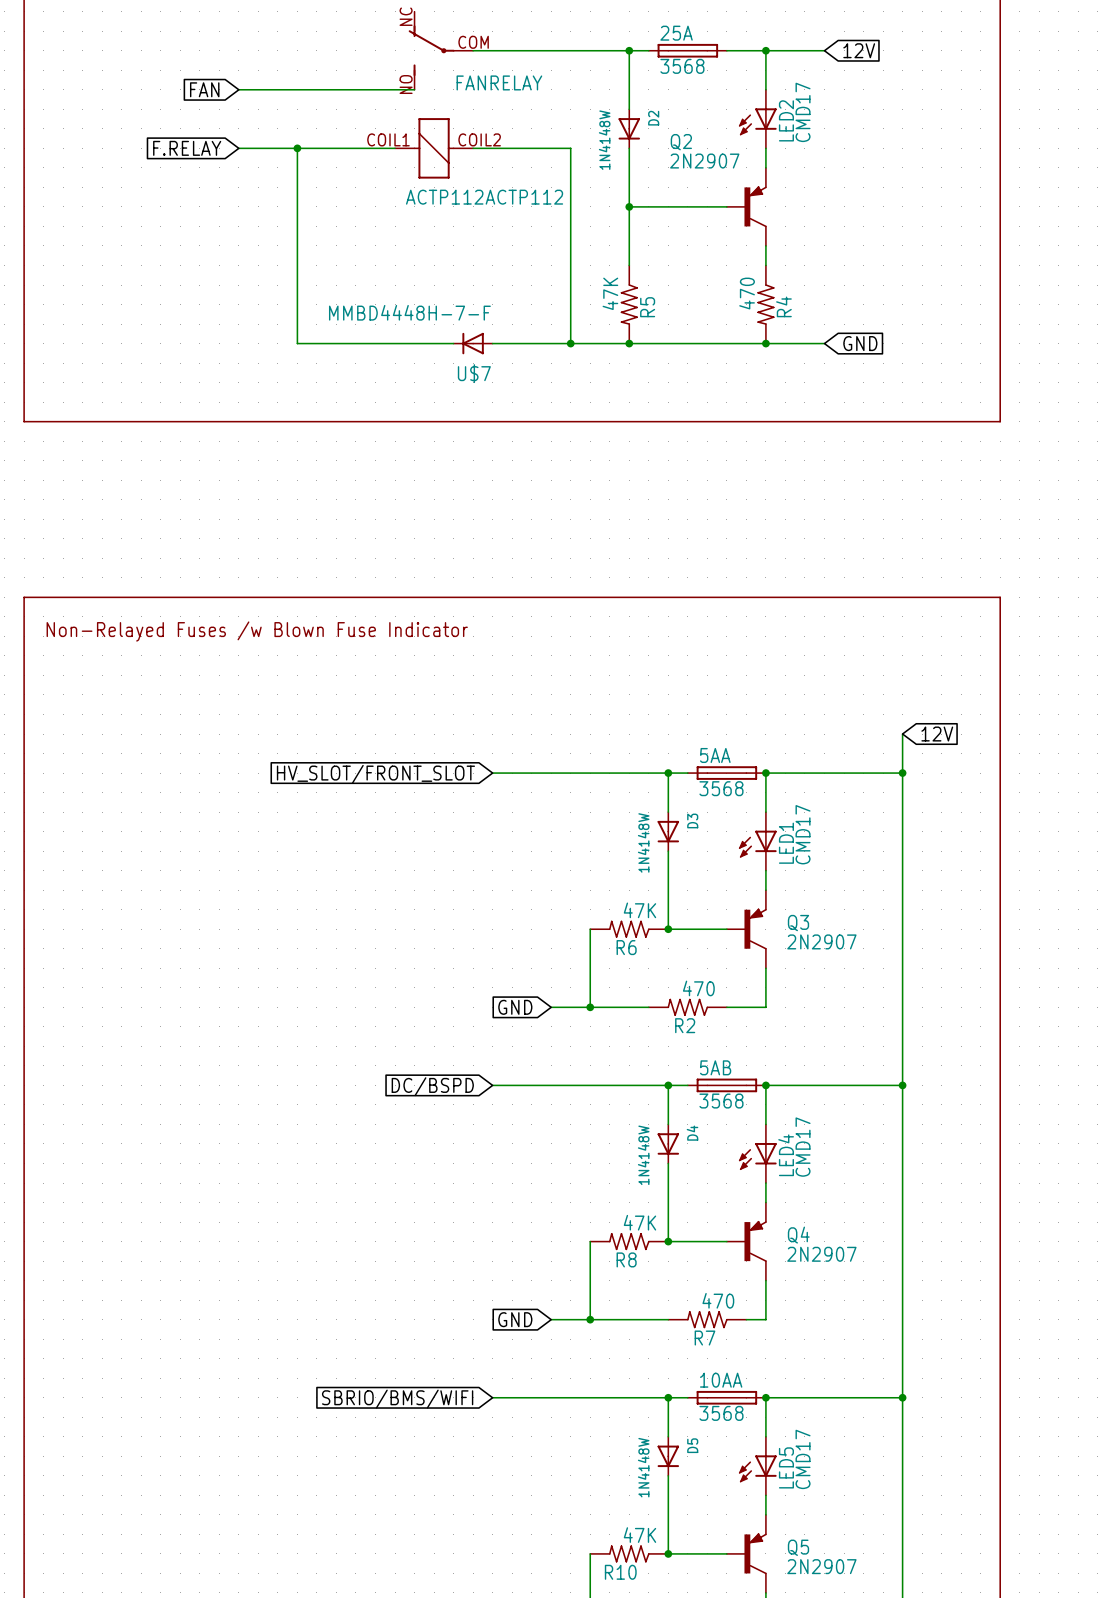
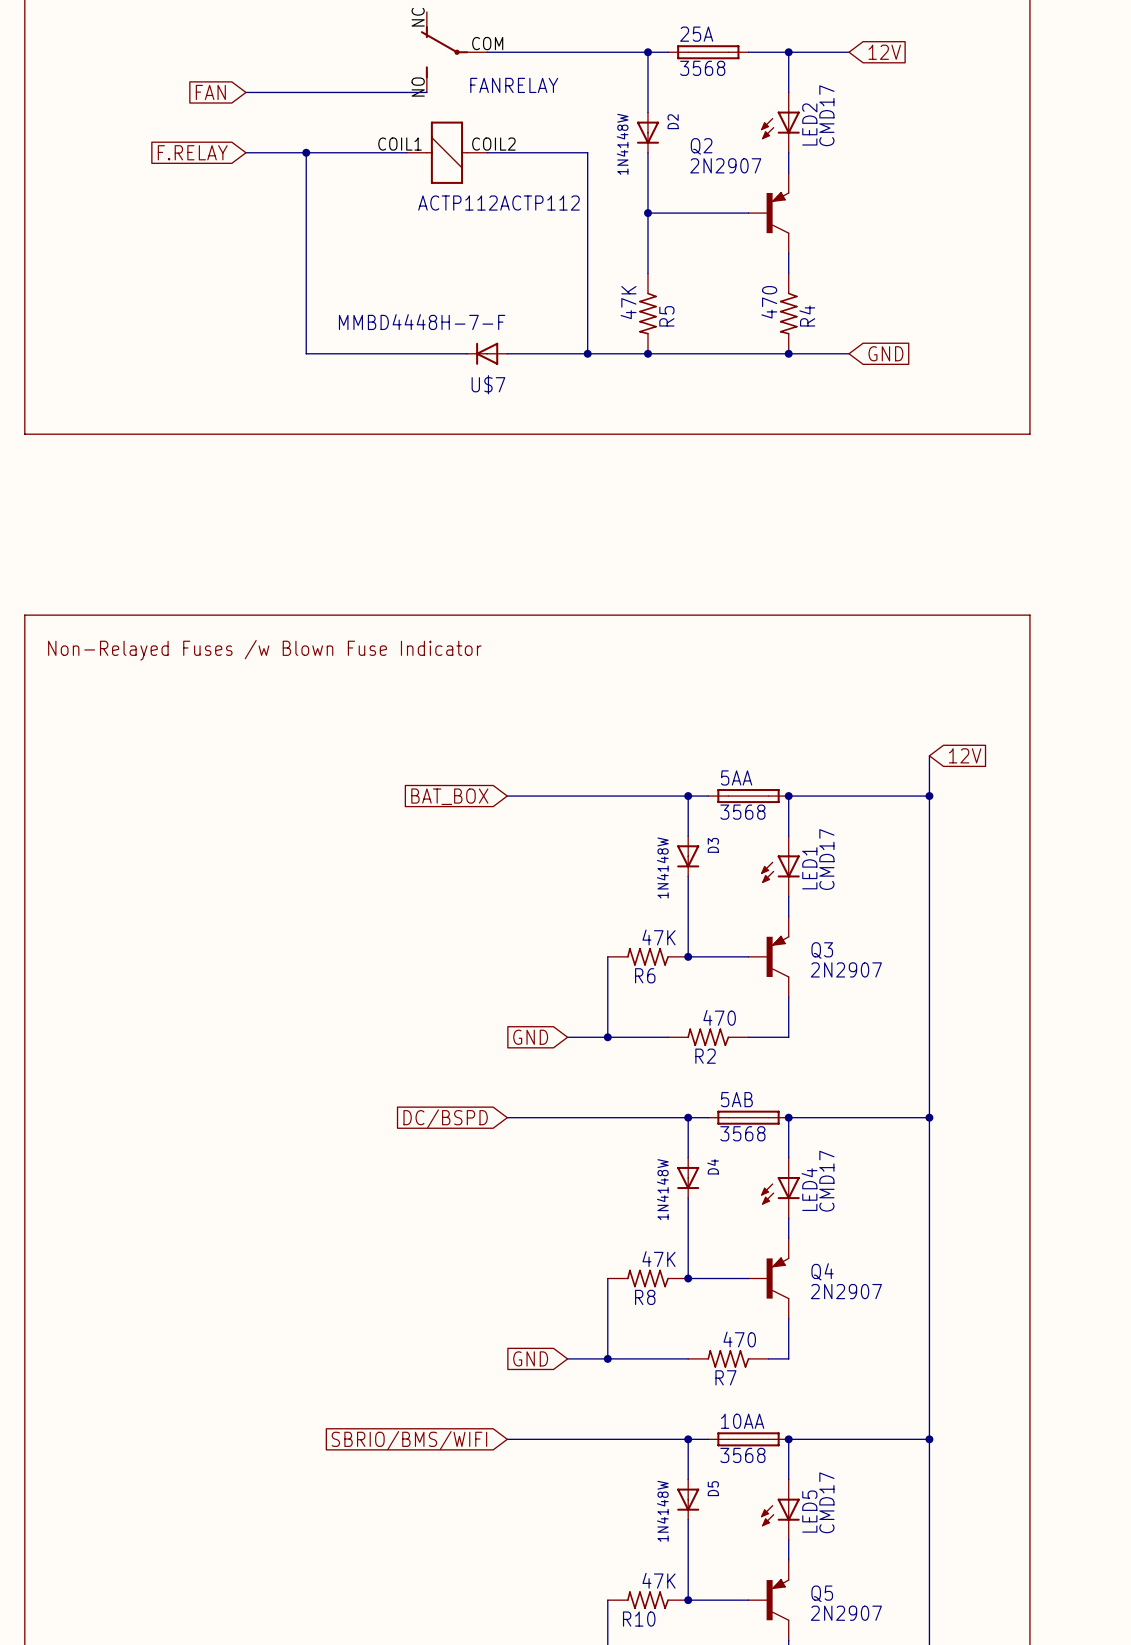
global label: HV_SLOT/FRONT_SLOT (375, 774) -> BAT_BOX (449, 796)

